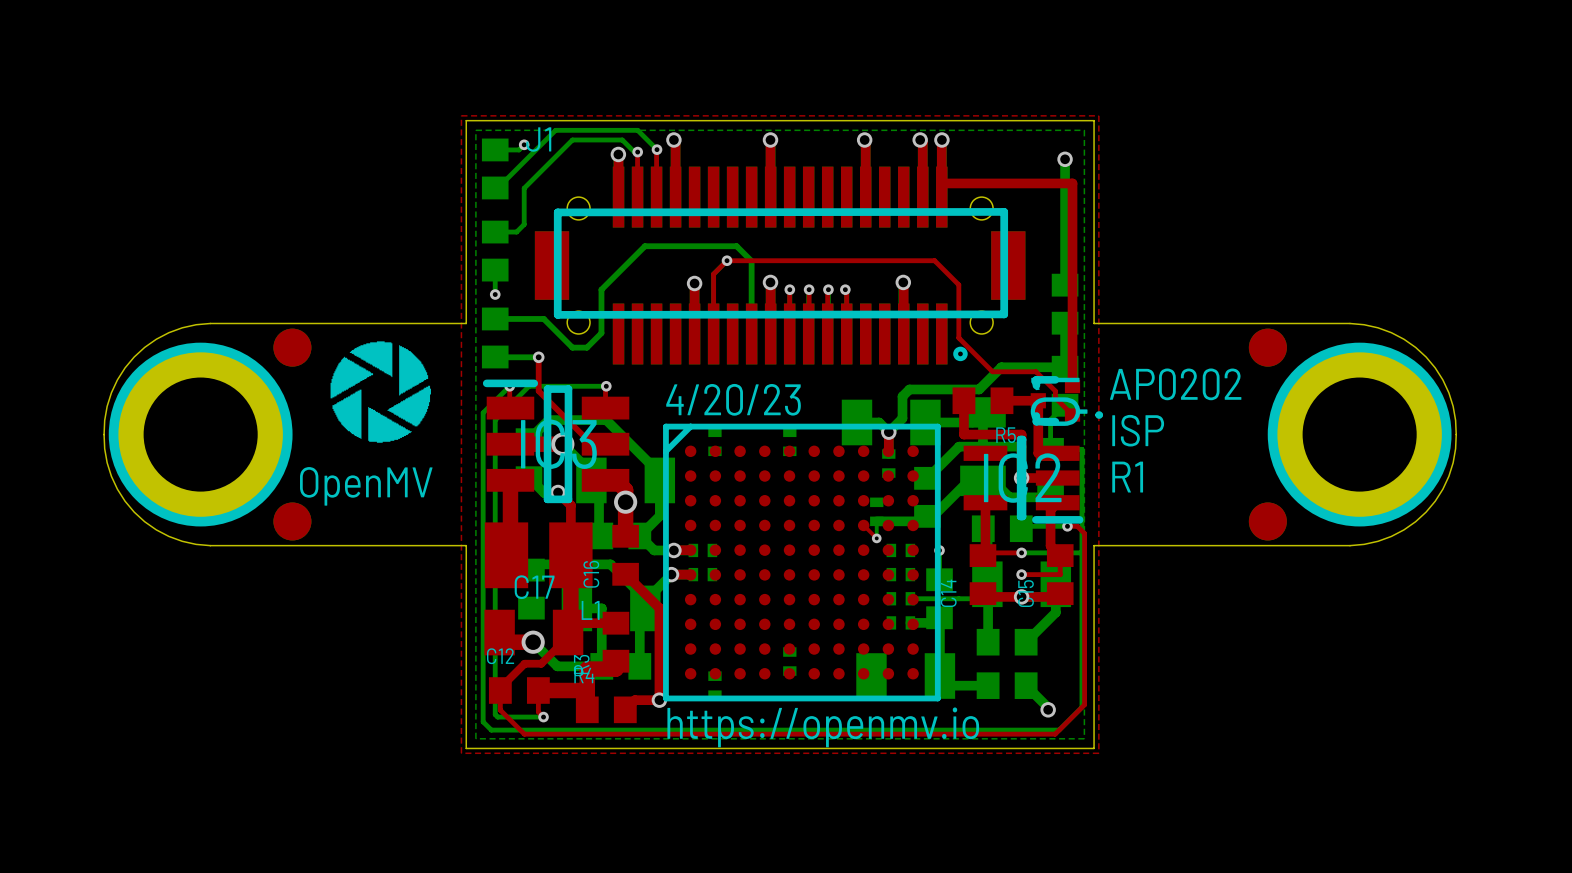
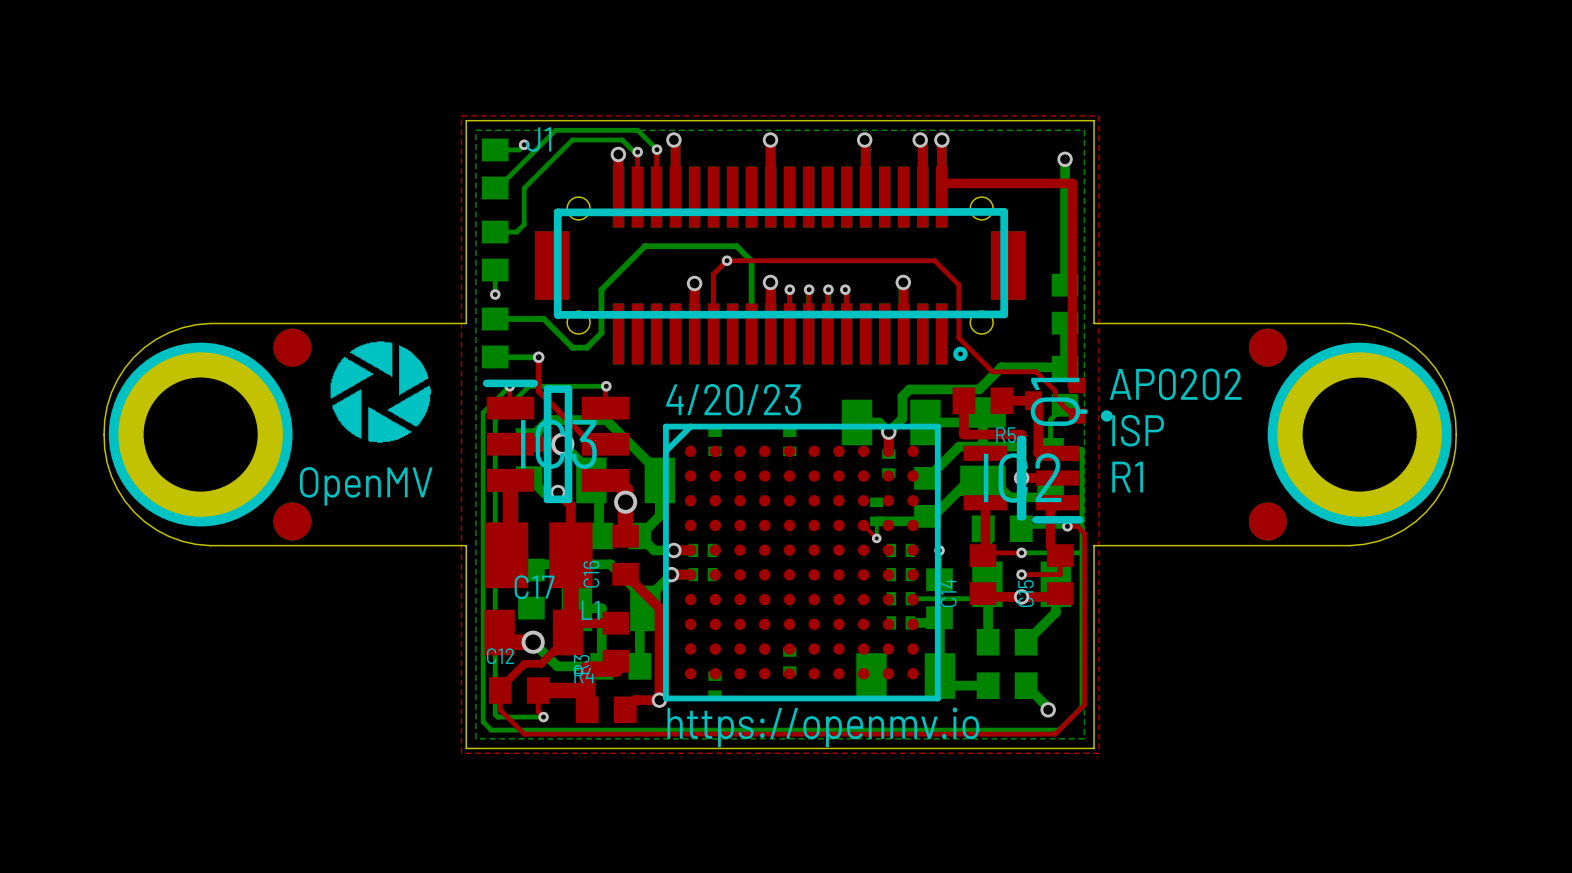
Q1 footprint: [1030, 376, 1103, 426] -> [1024, 377, 1113, 424]

